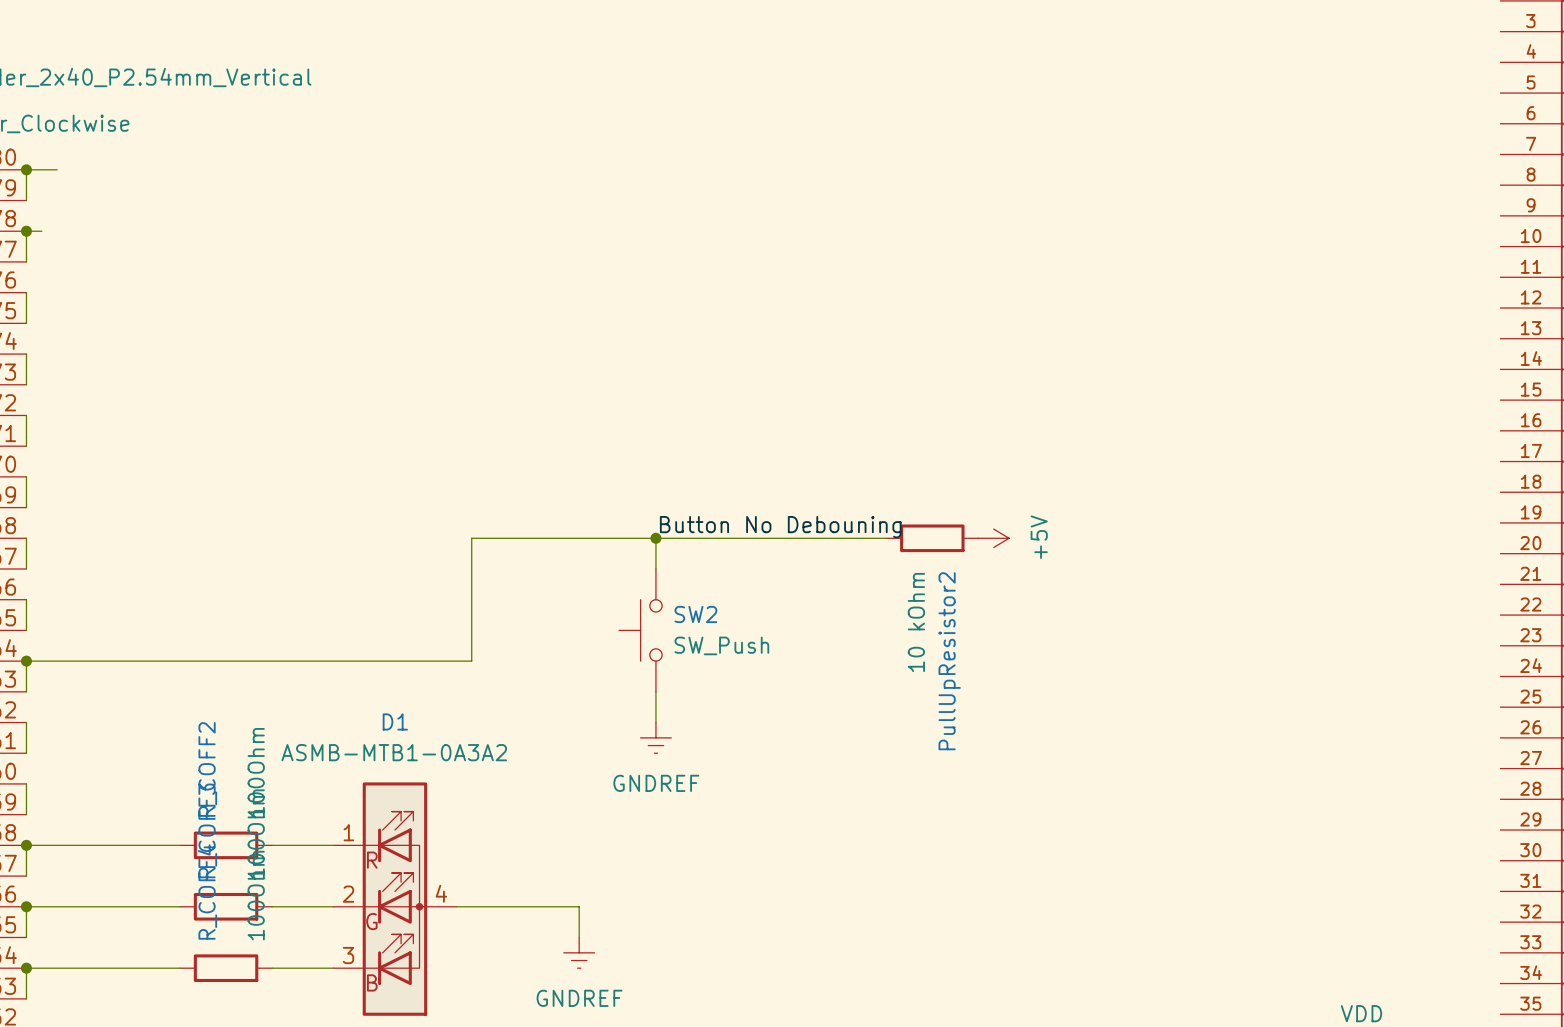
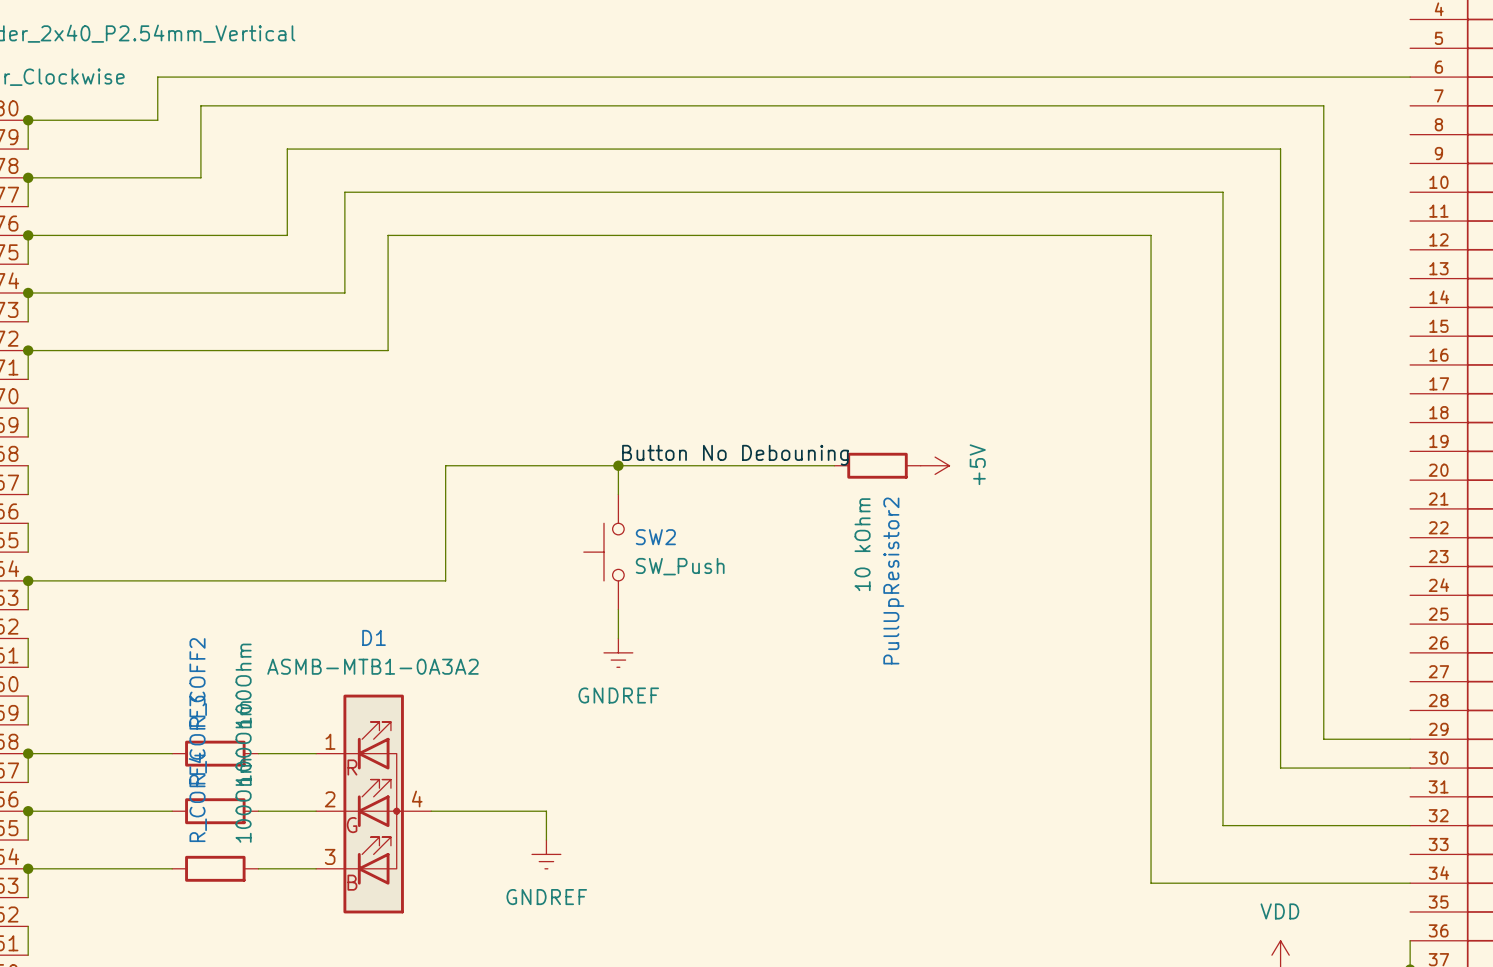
wire: none -> (1410, 77) (157, 77) (157, 120) (56, 120)
wire: none -> (42, 177) (200, 177) (200, 105) (1323, 105) (1323, 739) (1410, 739)
wire: none -> (28, 235) (287, 235) (287, 149) (1280, 149) (1280, 768) (1410, 768)
junction: none -> (28, 235)
wire: none -> (28, 292) (344, 292) (344, 192) (1222, 192) (1222, 825) (1410, 825)
junction: none -> (28, 292)
wire: none -> (28, 350) (388, 350) (388, 235) (1151, 235) (1151, 883) (1410, 883)
junction: none -> (28, 350)

